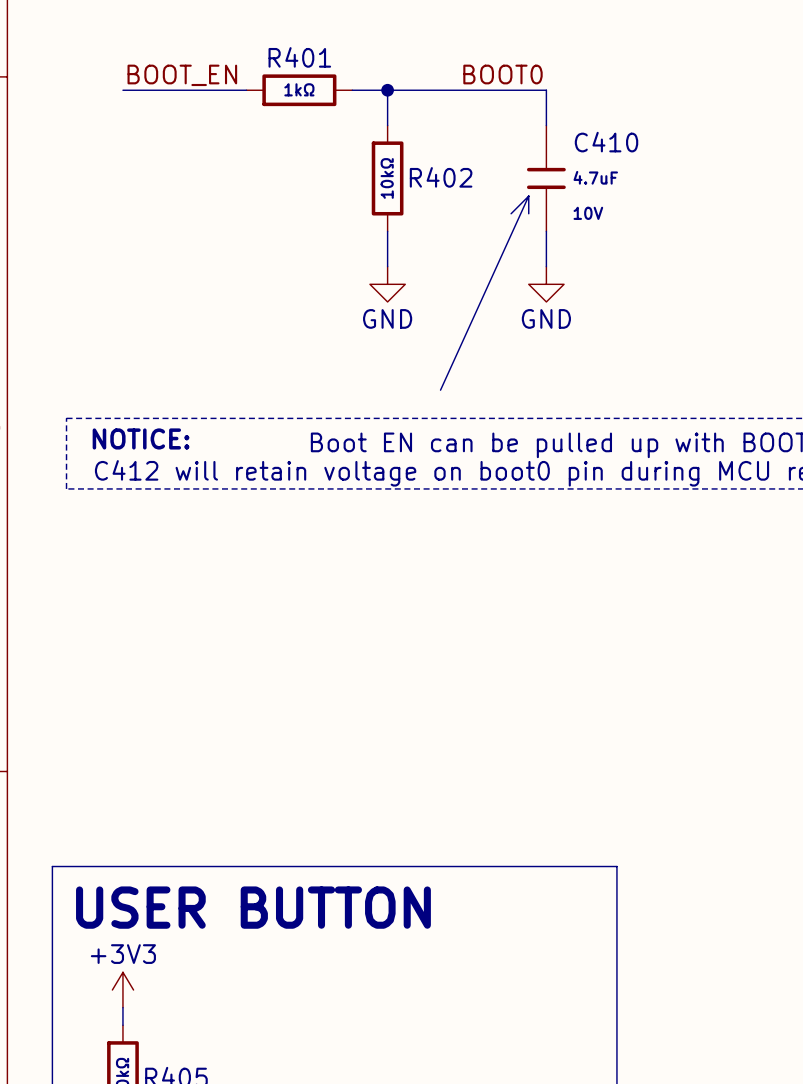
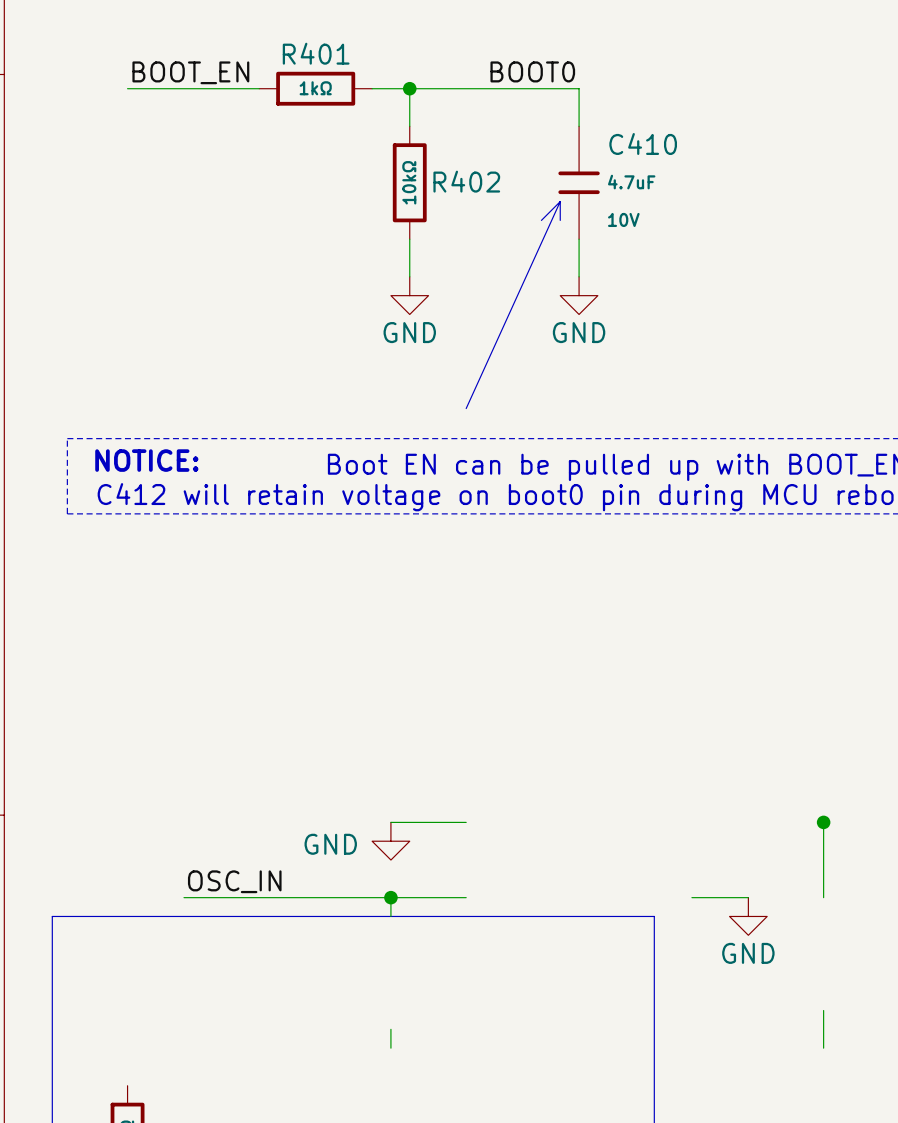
wire: none -> (390, 822) (466, 822)
wire: none -> (823, 822) (823, 897)
junction: none -> (823, 822)
power symbol: none -> GND (390, 841)
label: none -> OSC_IN (234, 881)
wire: none -> (184, 897) (466, 897)
wire: none -> (390, 897) (390, 916)
junction: none -> (390, 897)
wire: none -> (691, 897) (748, 897)
power symbol: none -> GND (748, 916)
text: USER BUTTON (253, 907) -> none
wire: none -> (823, 1010) (823, 1048)
power symbol: +3V3 (122, 990) -> none
wire: (122, 1007) (122, 1025) -> (390, 1029) (390, 1048)

